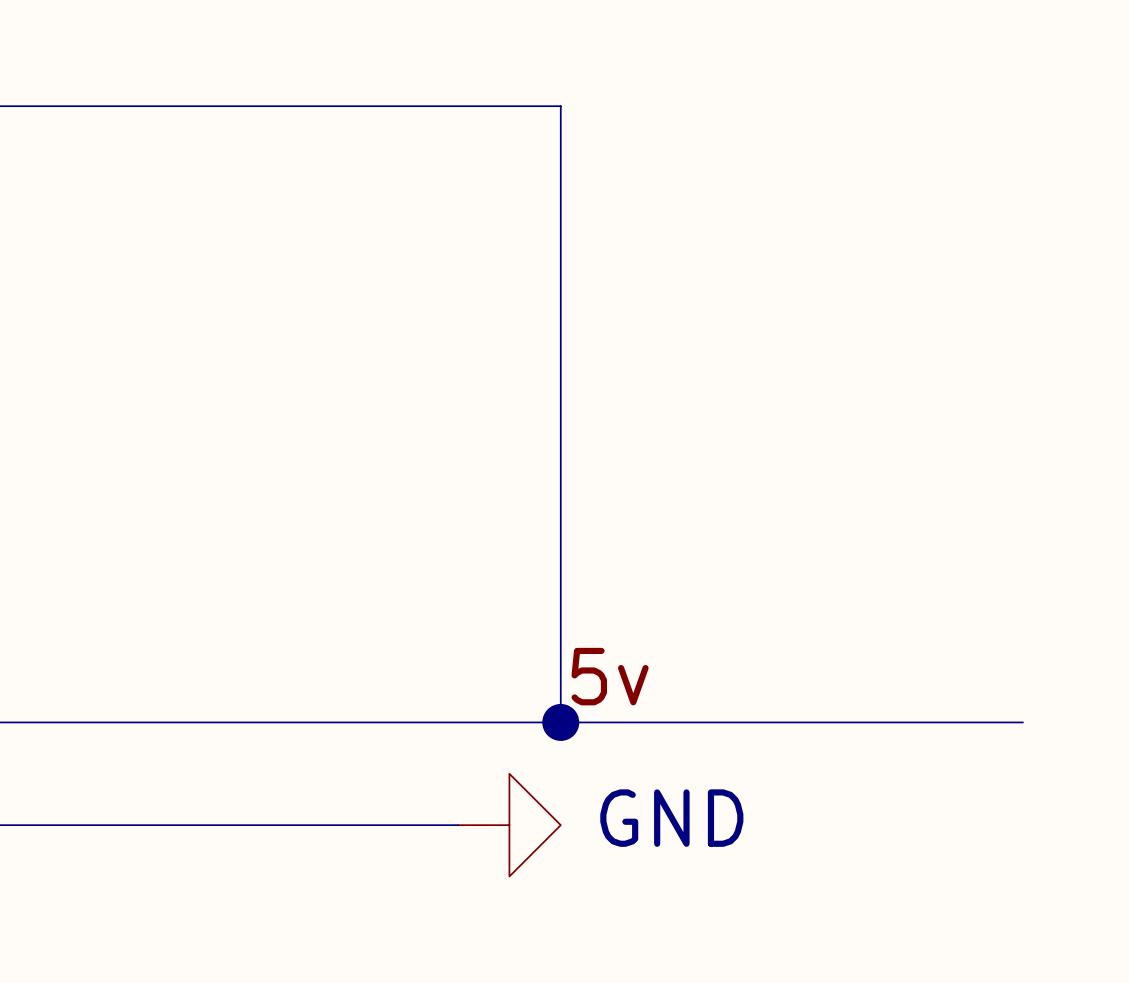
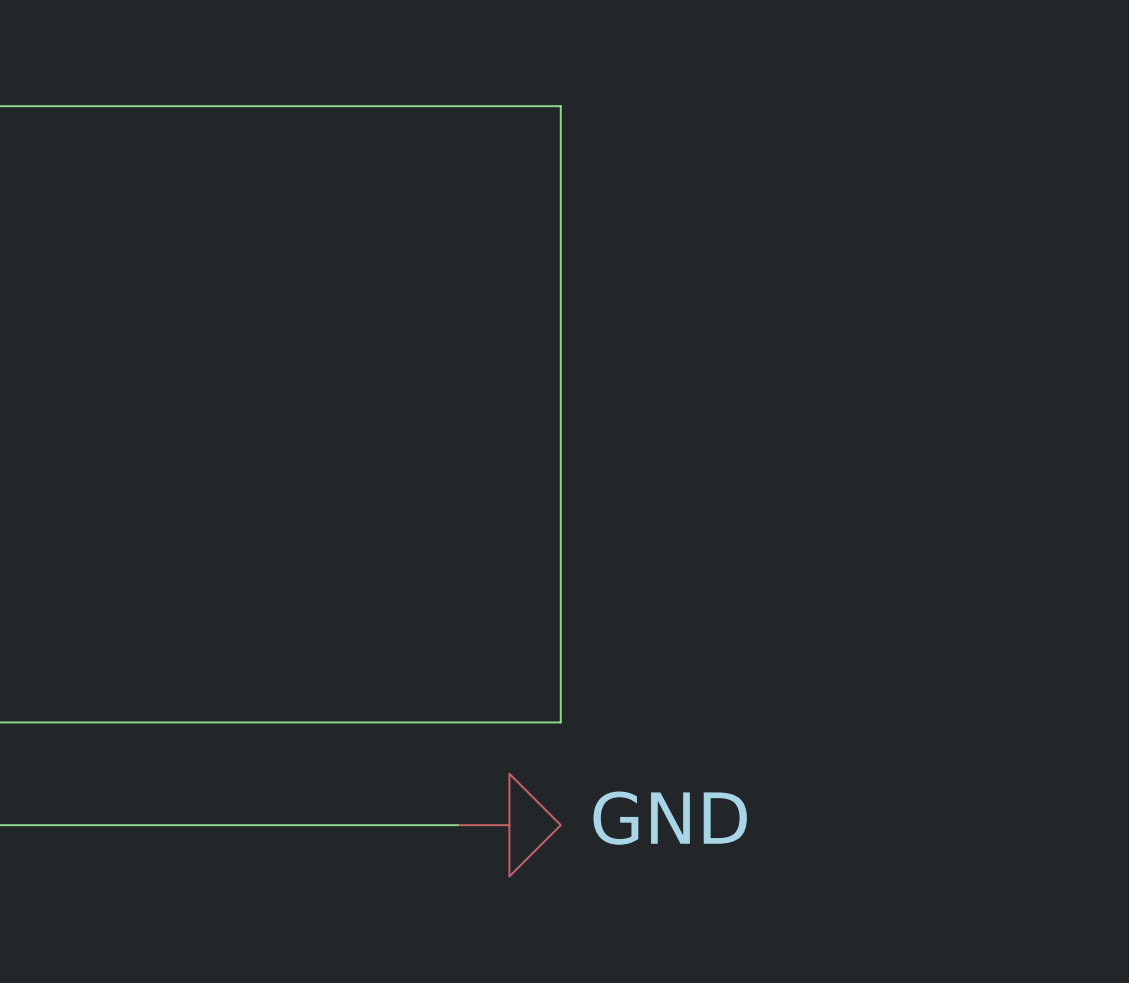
label: 5v (610, 676) -> none
wire: (560, 722) (1022, 722) -> none
junction: (560, 722) -> none

